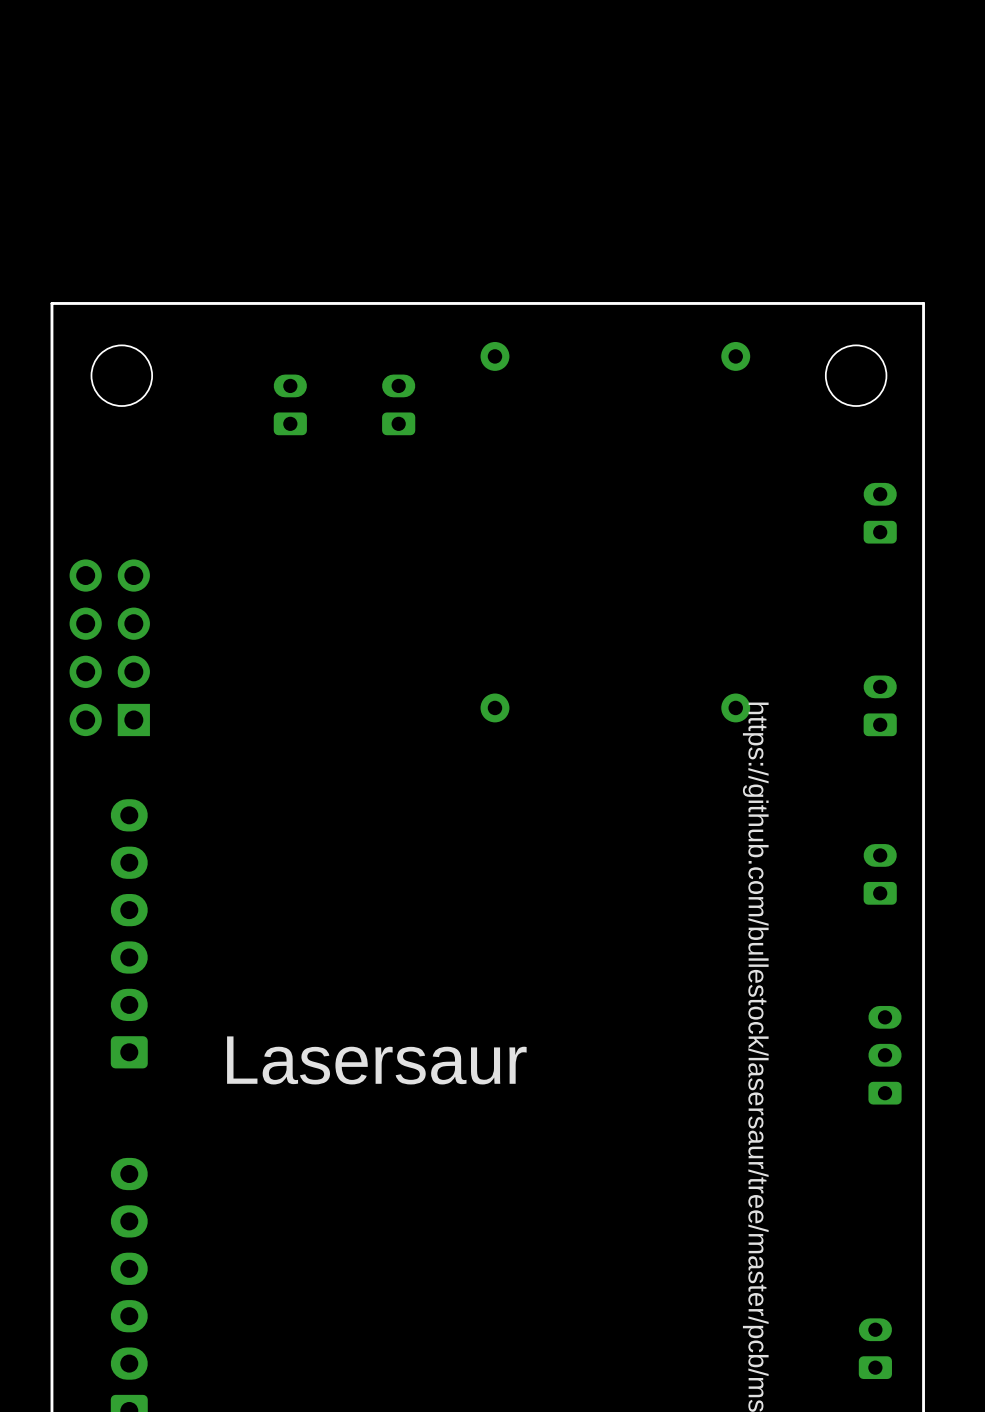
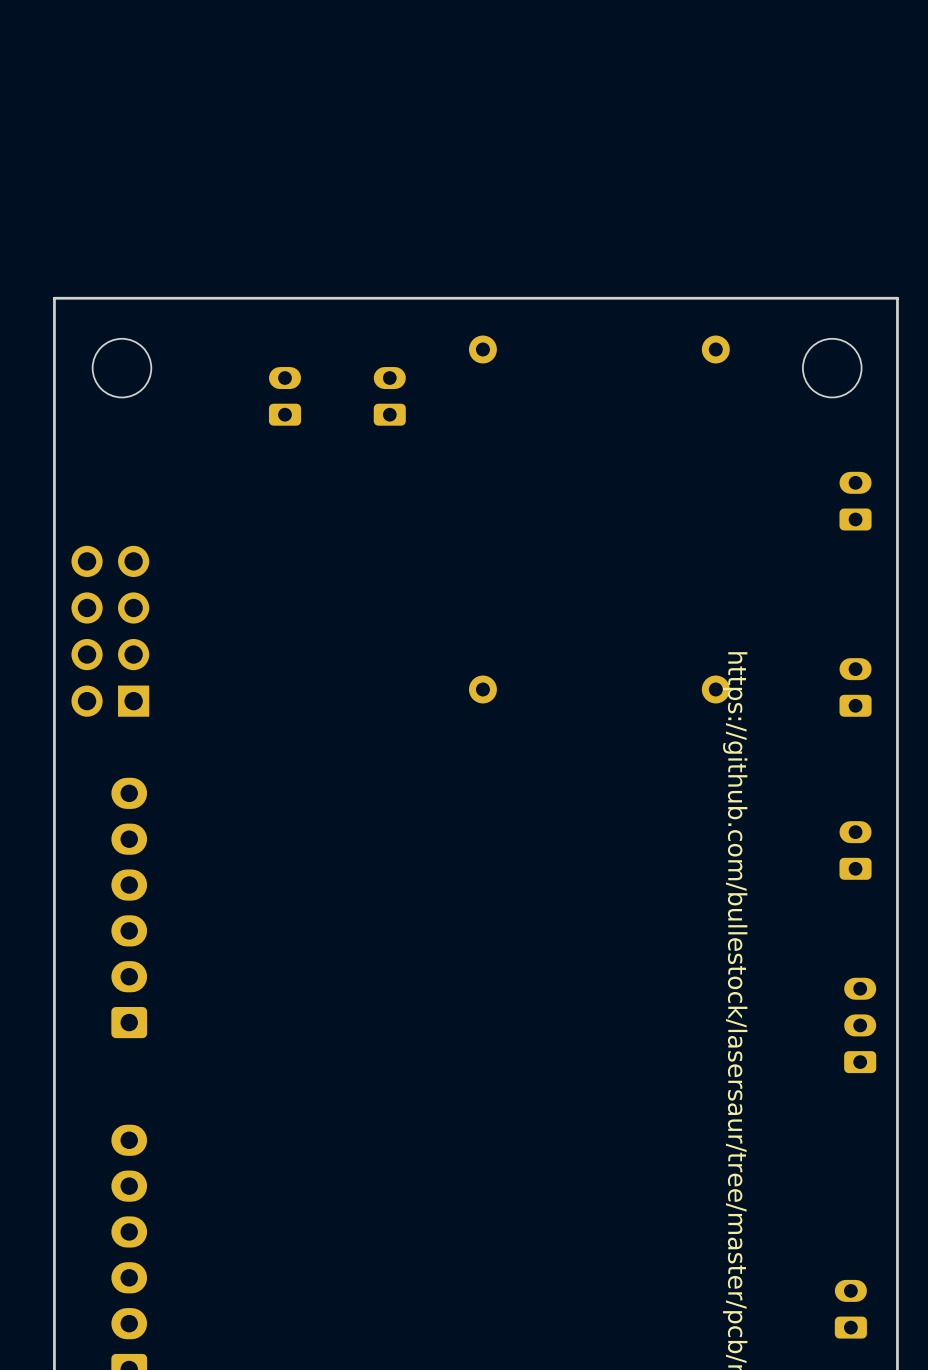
text: Lasersaur (376, 1060) -> none

